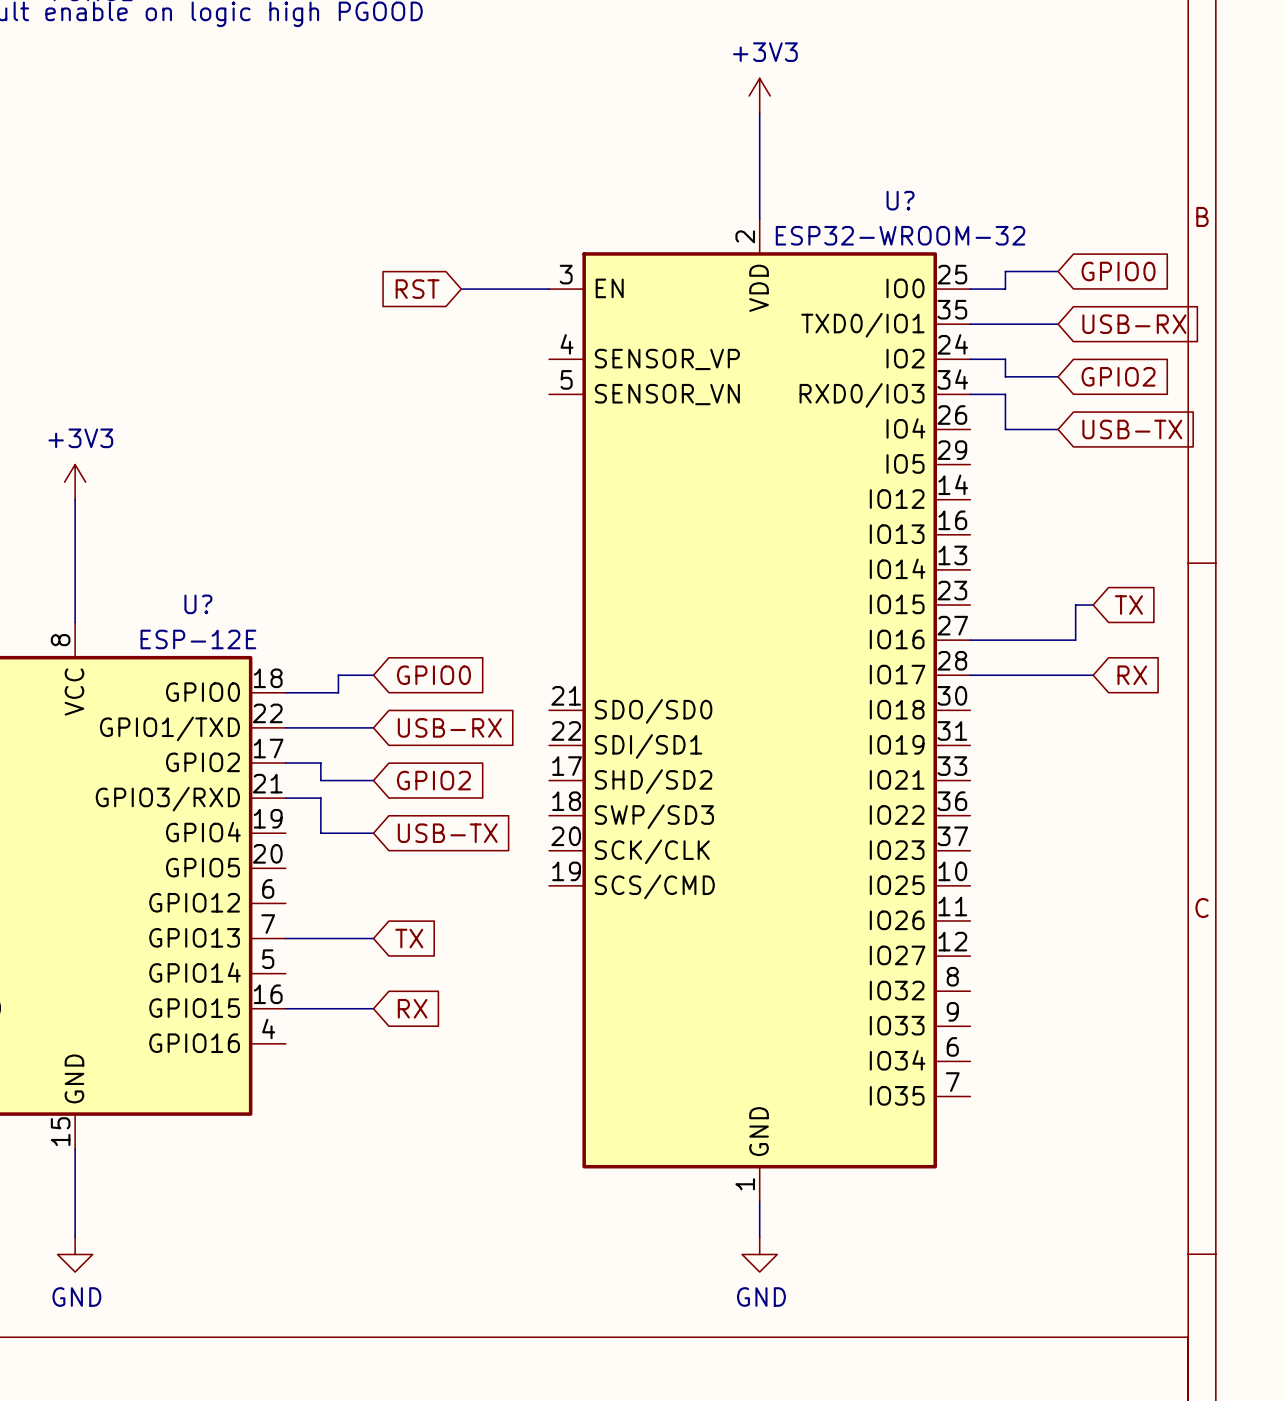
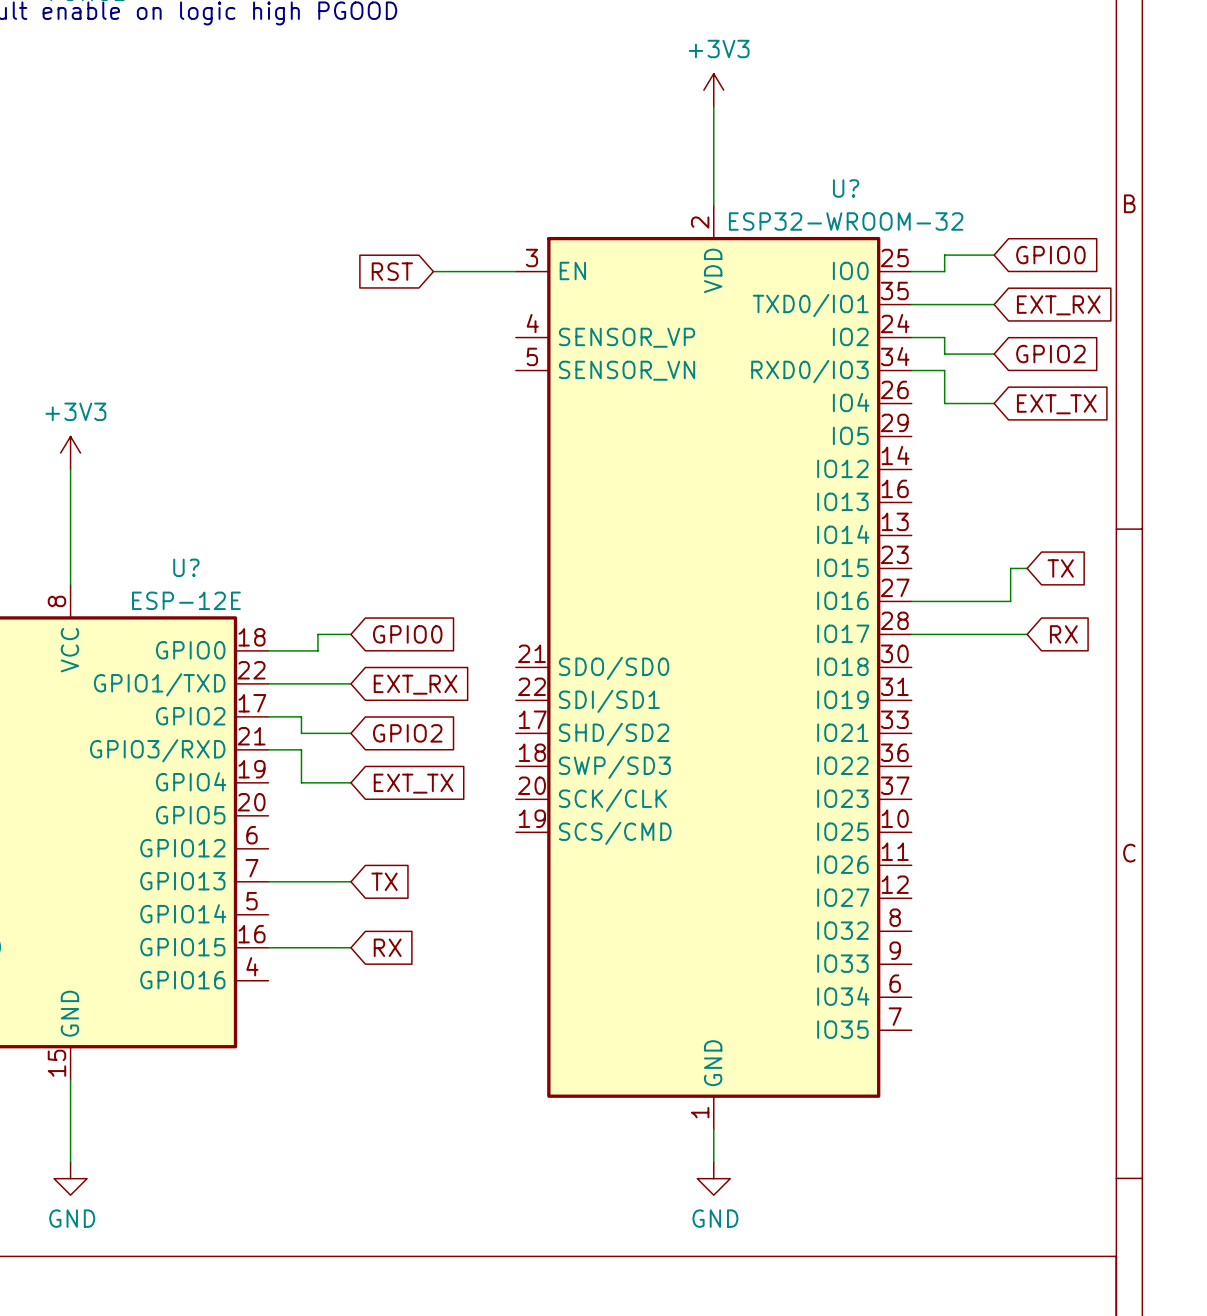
global label: USB-RX (1134, 324) -> EXT_RX (1058, 305)
global label: USB-TX (1132, 429) -> EXT_TX (1056, 404)
global label: USB-RX (449, 727) -> EXT_RX (415, 684)
global label: USB-TX (447, 833) -> EXT_TX (413, 783)

